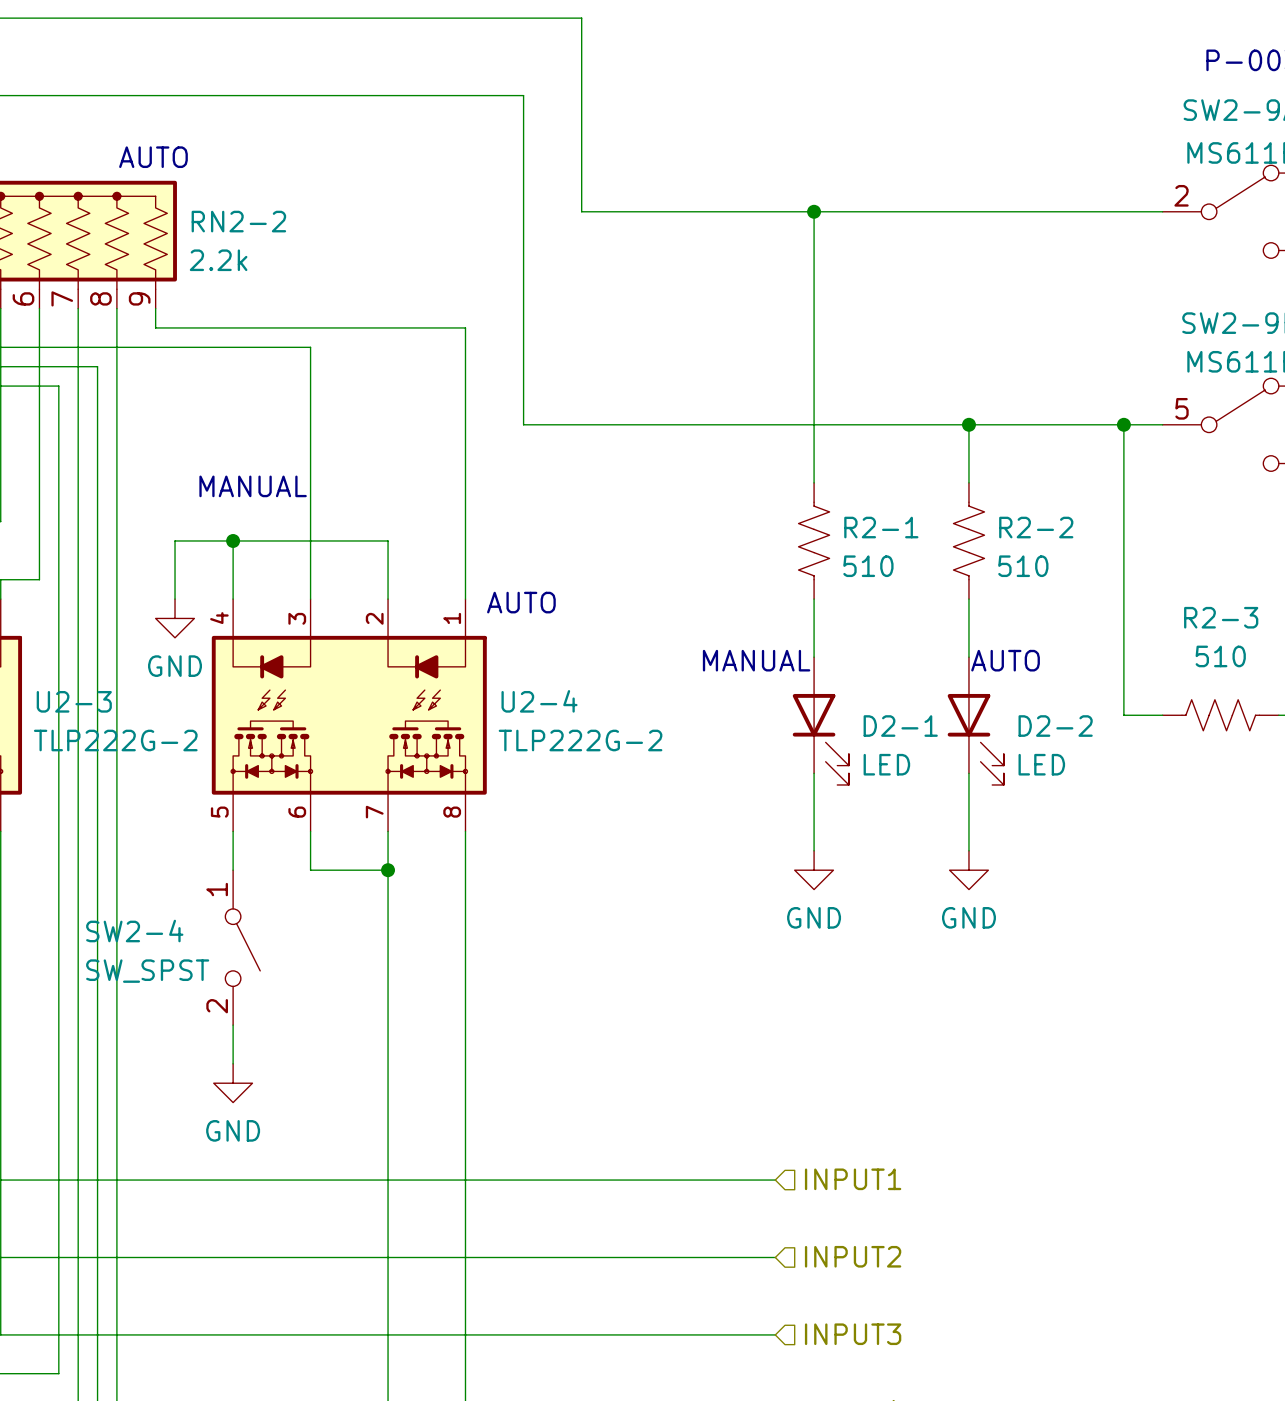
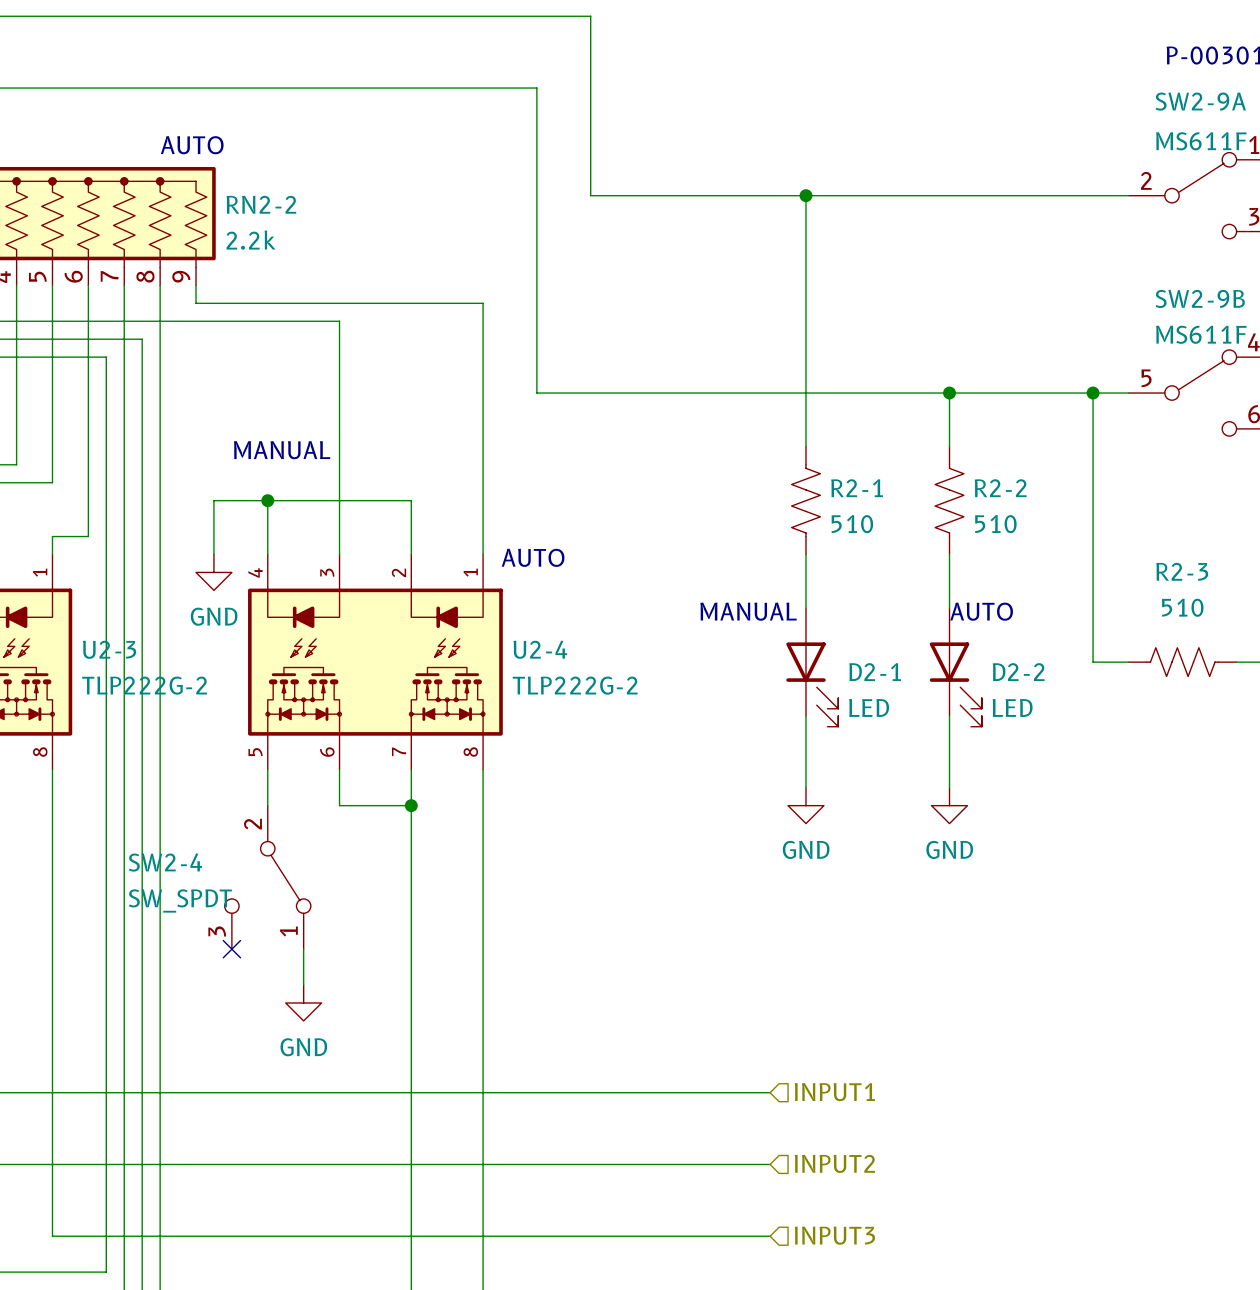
SW2-4 symbol: [225, 870, 261, 1026] -> [224, 805, 311, 950]
SW2-4 value: SW_SPST (147, 971) -> SW_SPDT (180, 900)
no-connect mark: none -> (231, 949)
wire: (233, 1025) (233, 1063) -> (303, 949) (303, 985)
power symbol position: GND (233, 1083) -> GND (303, 1003)

